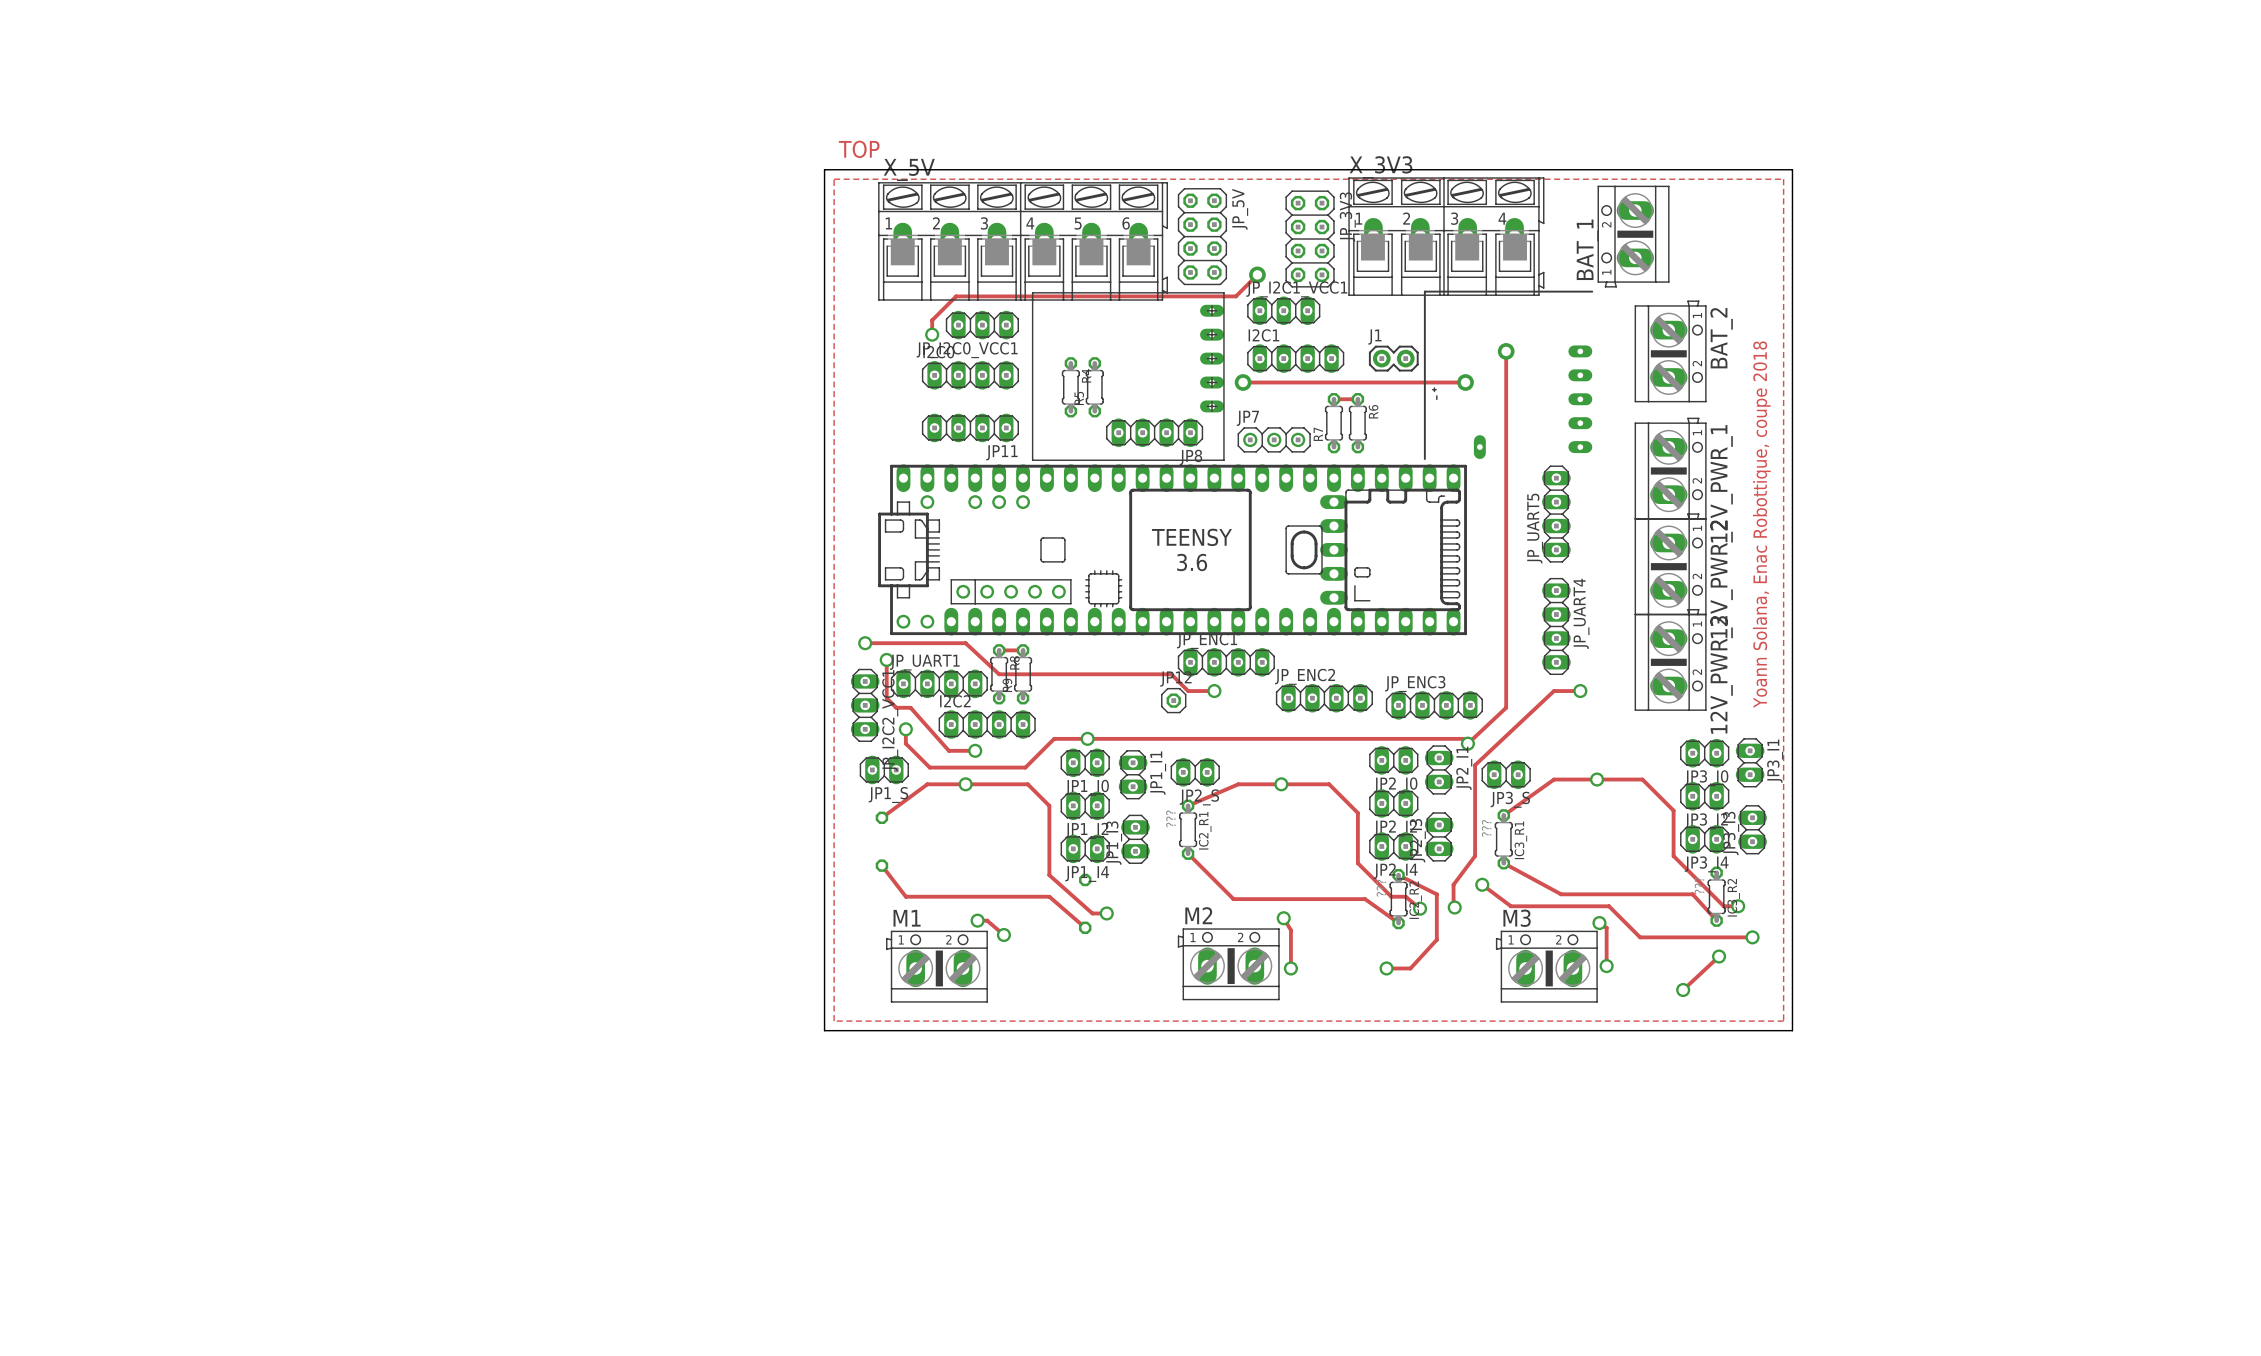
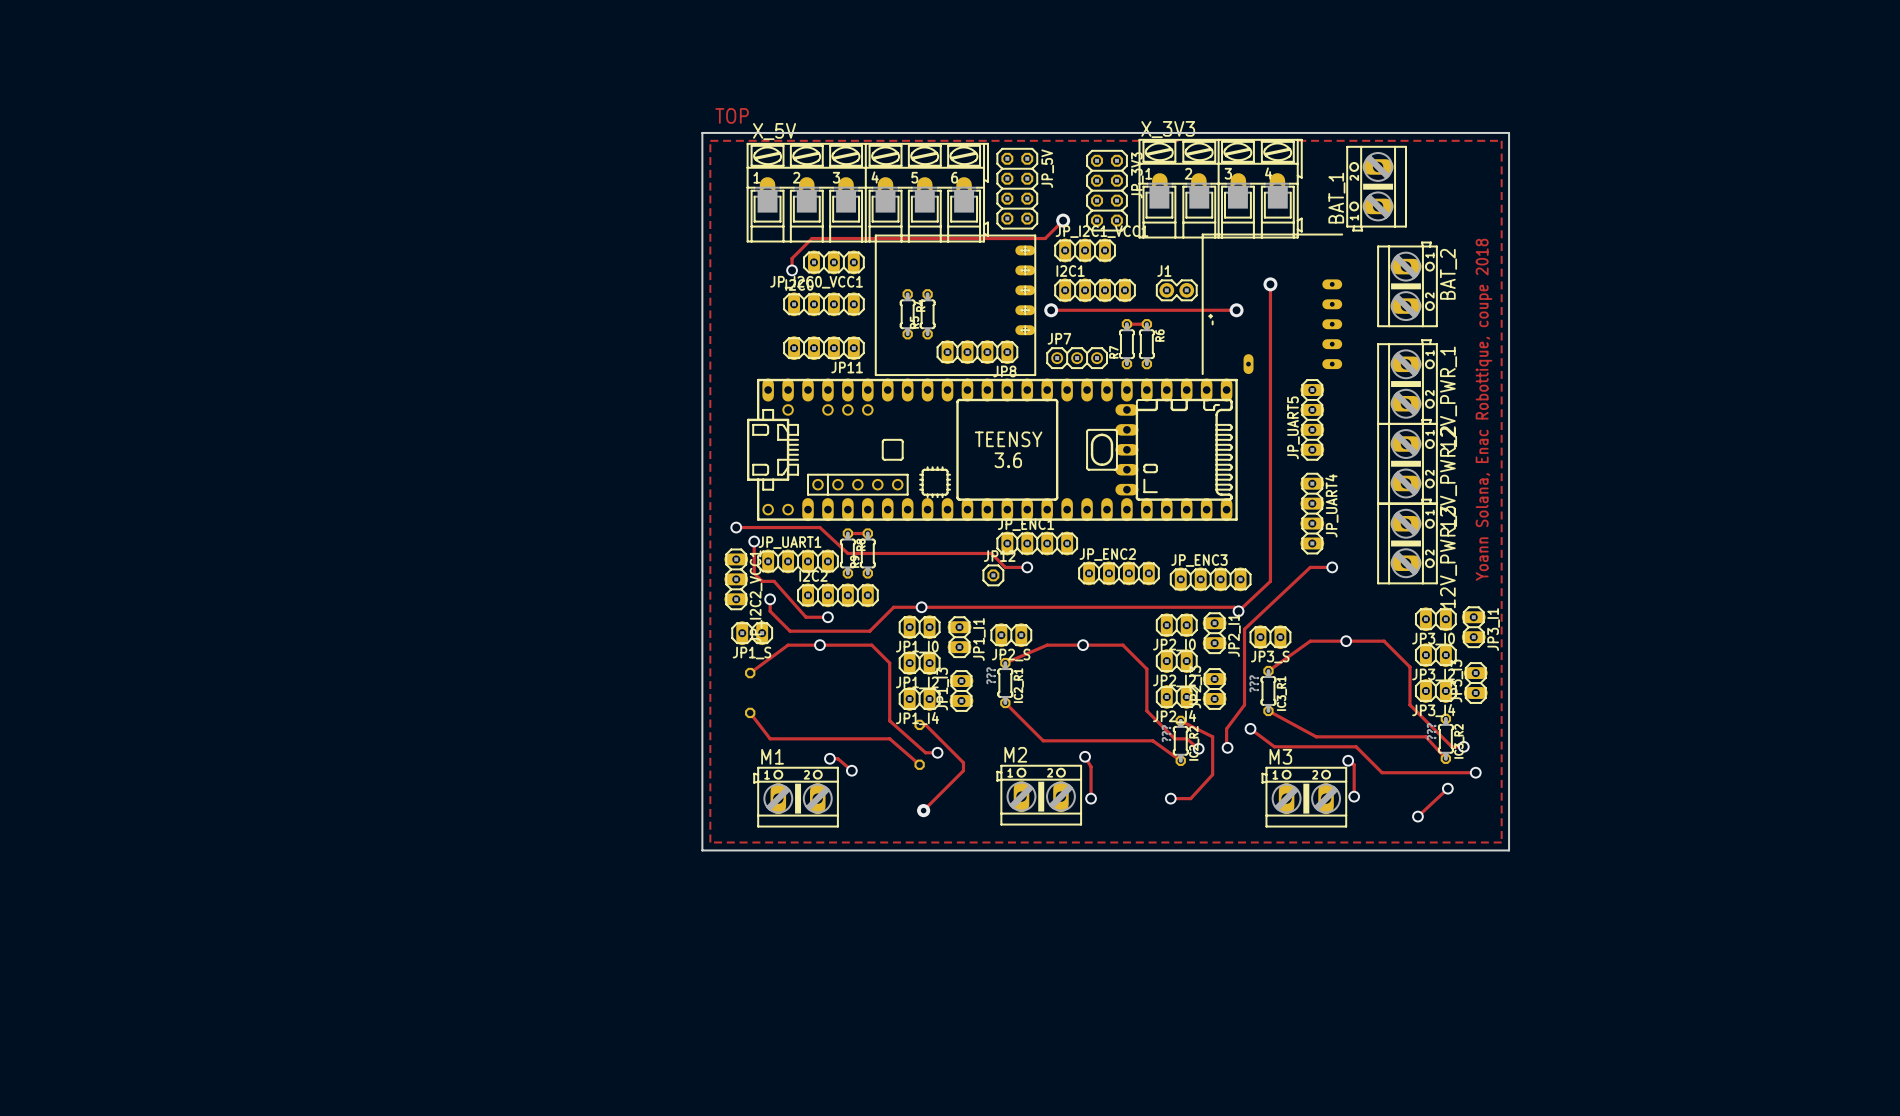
track: none -> (919, 724) (925, 724) (963, 762) (963, 770) (923, 810)
via: none -> (923, 810)

